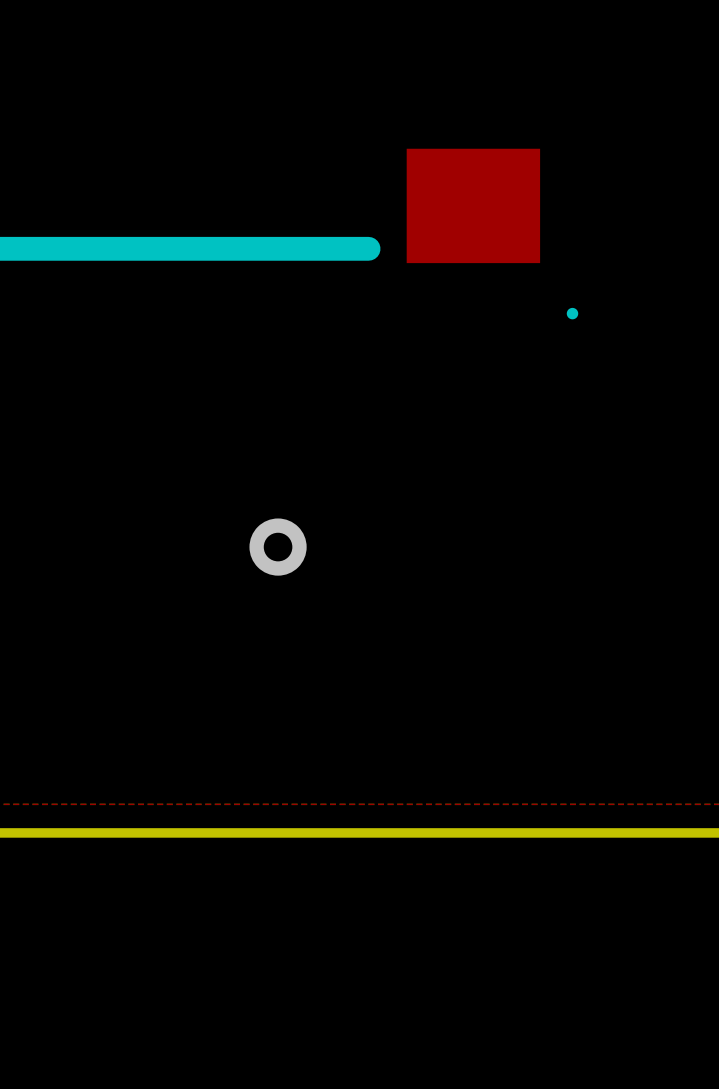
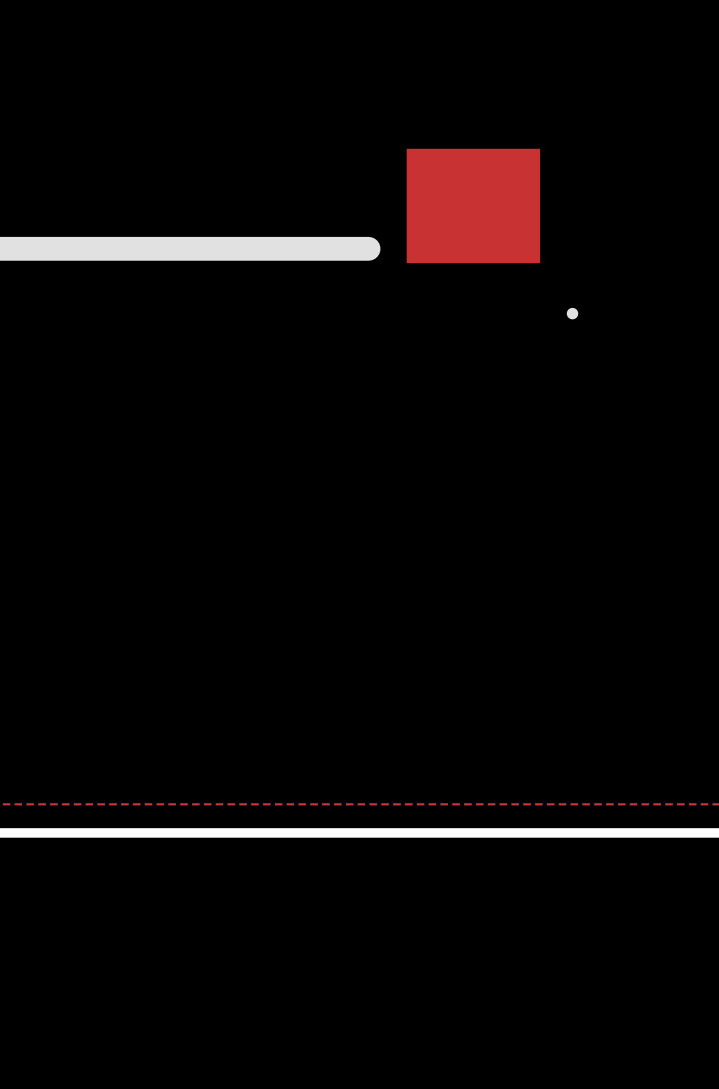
via: (278, 547) -> none

